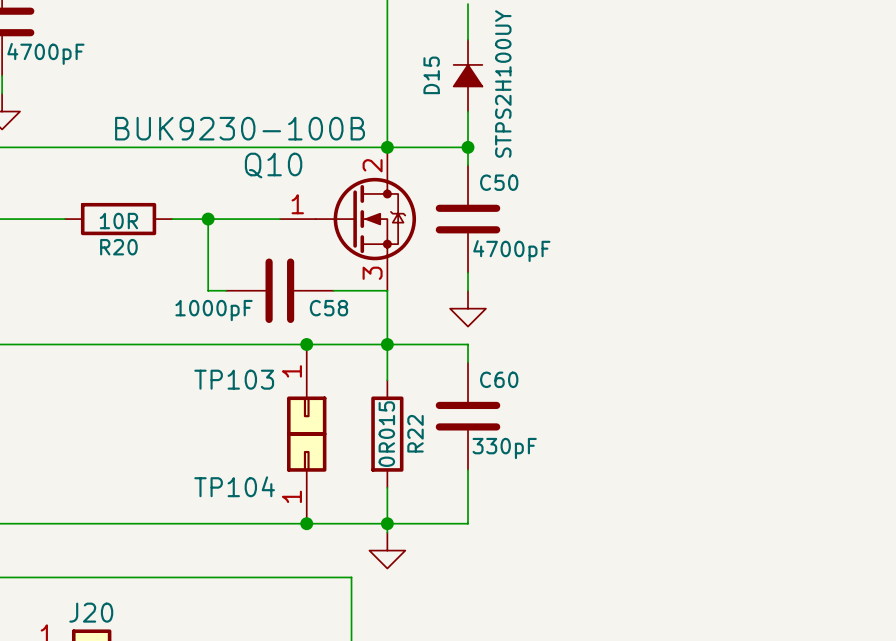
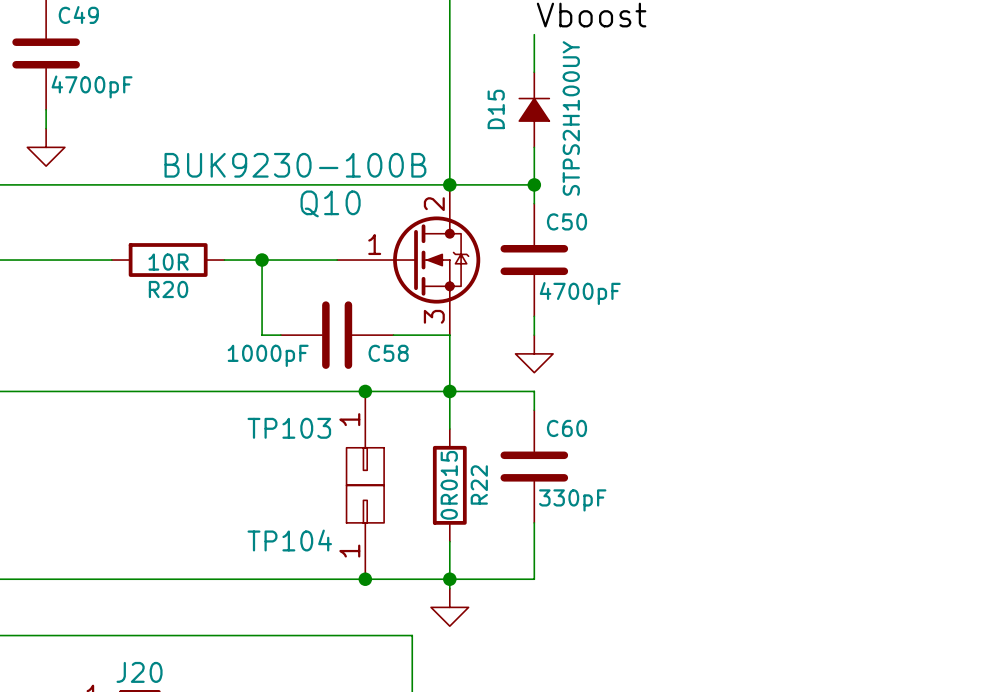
Q10 symbol: [279, 147, 417, 291] -> [337, 184, 481, 336]
TP103 symbol: [287, 344, 327, 436] -> [346, 391, 385, 486]
TP104 symbol: [287, 432, 327, 524] -> [346, 485, 385, 580]

